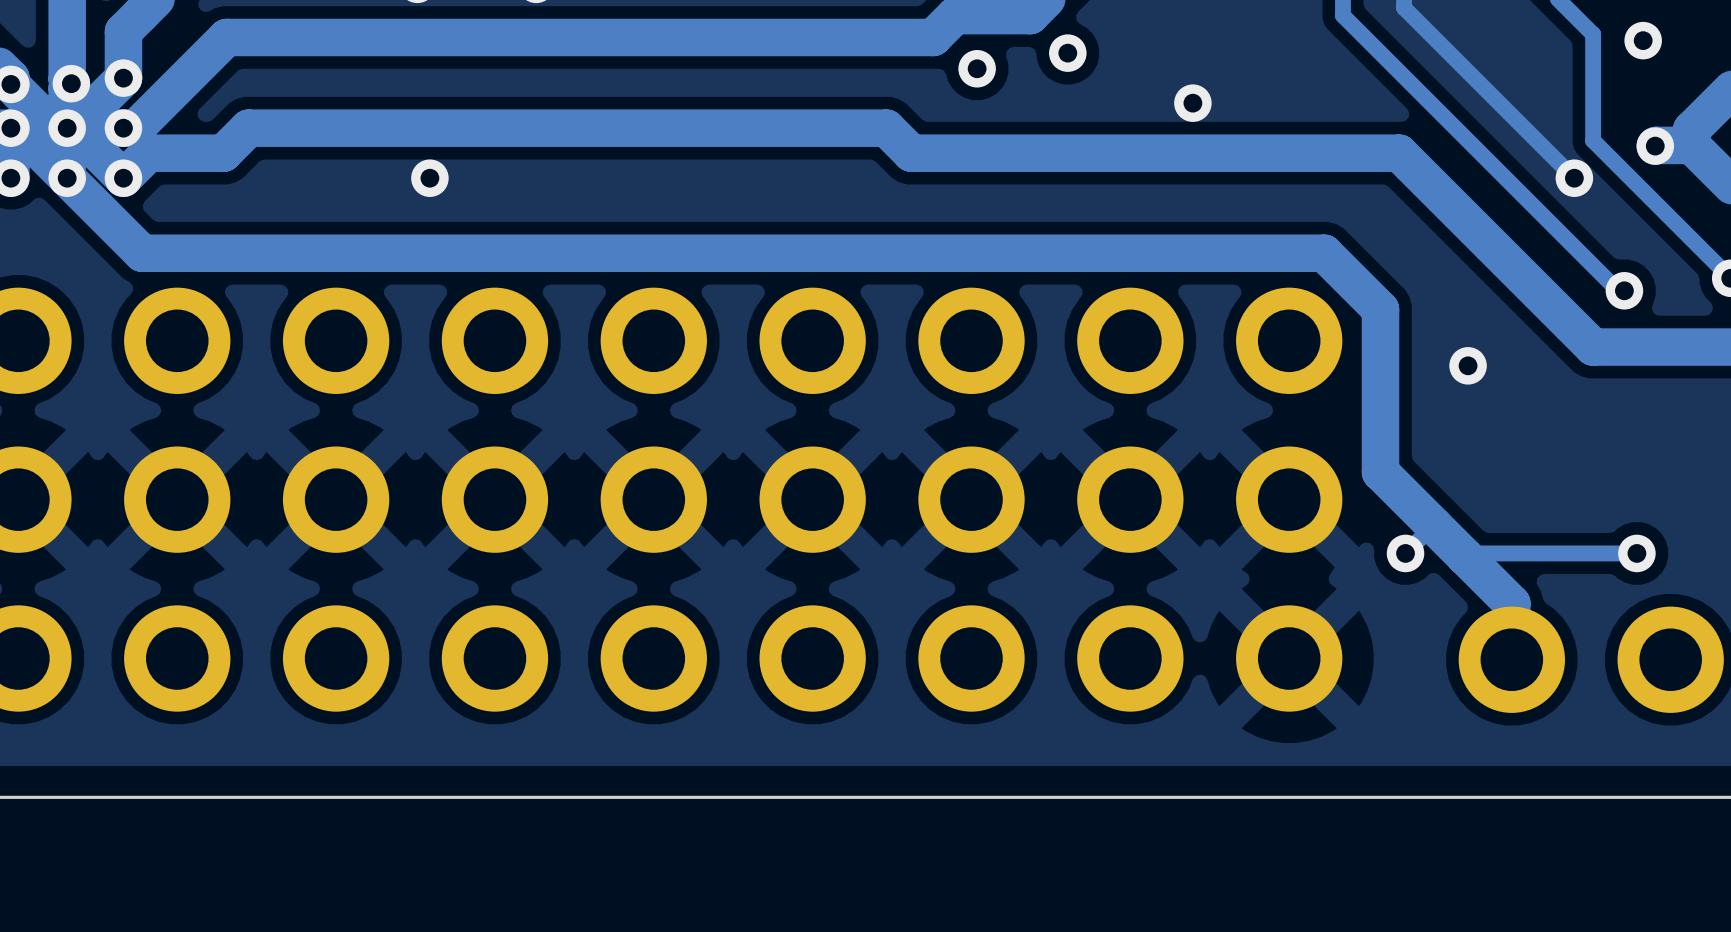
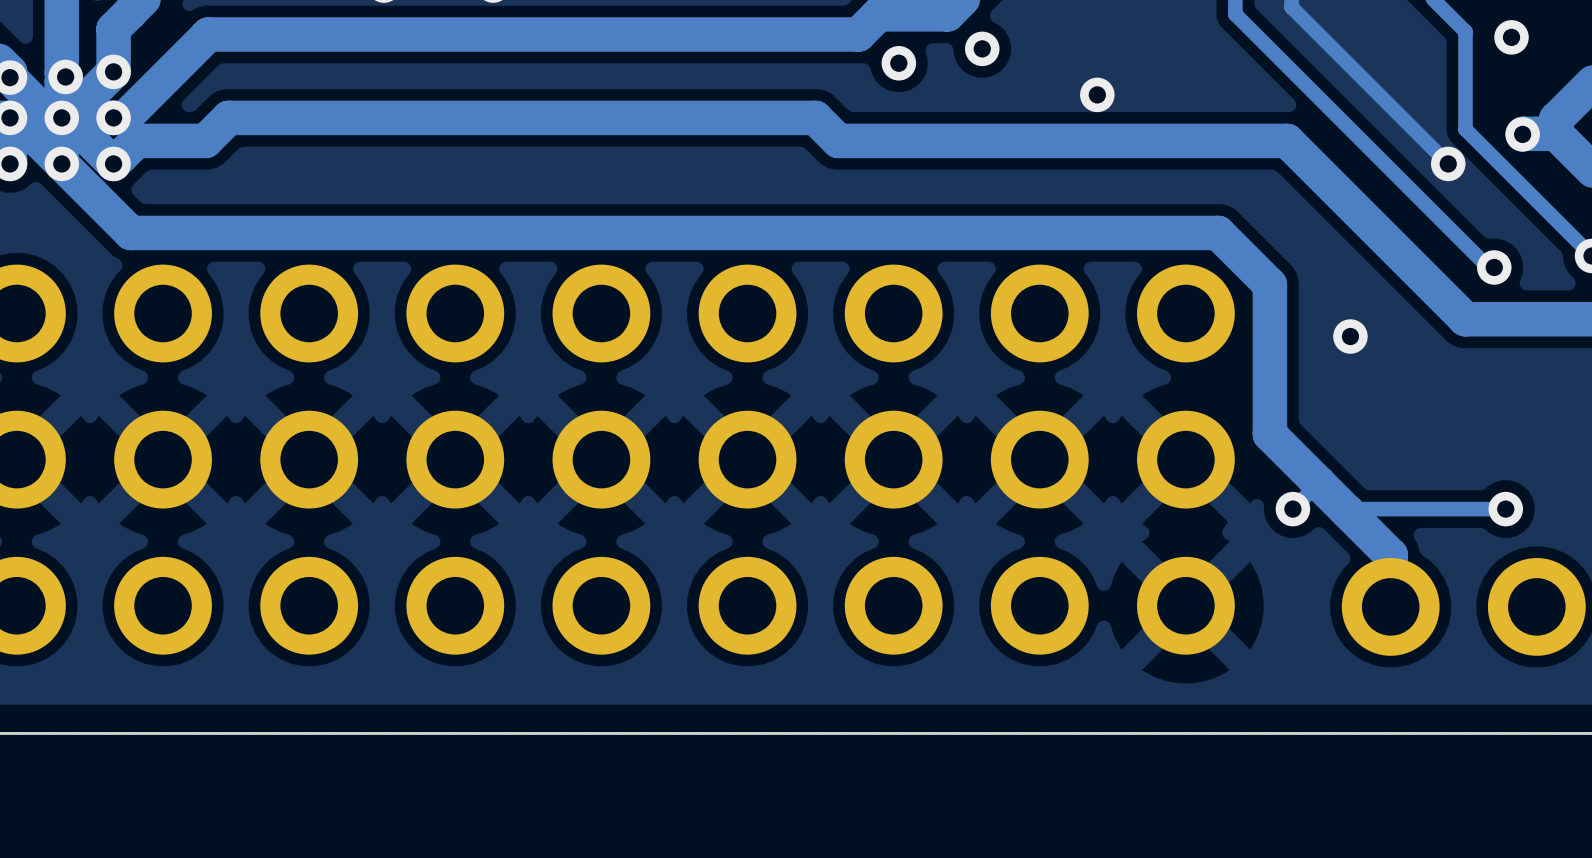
via: (429, 178) -> none

